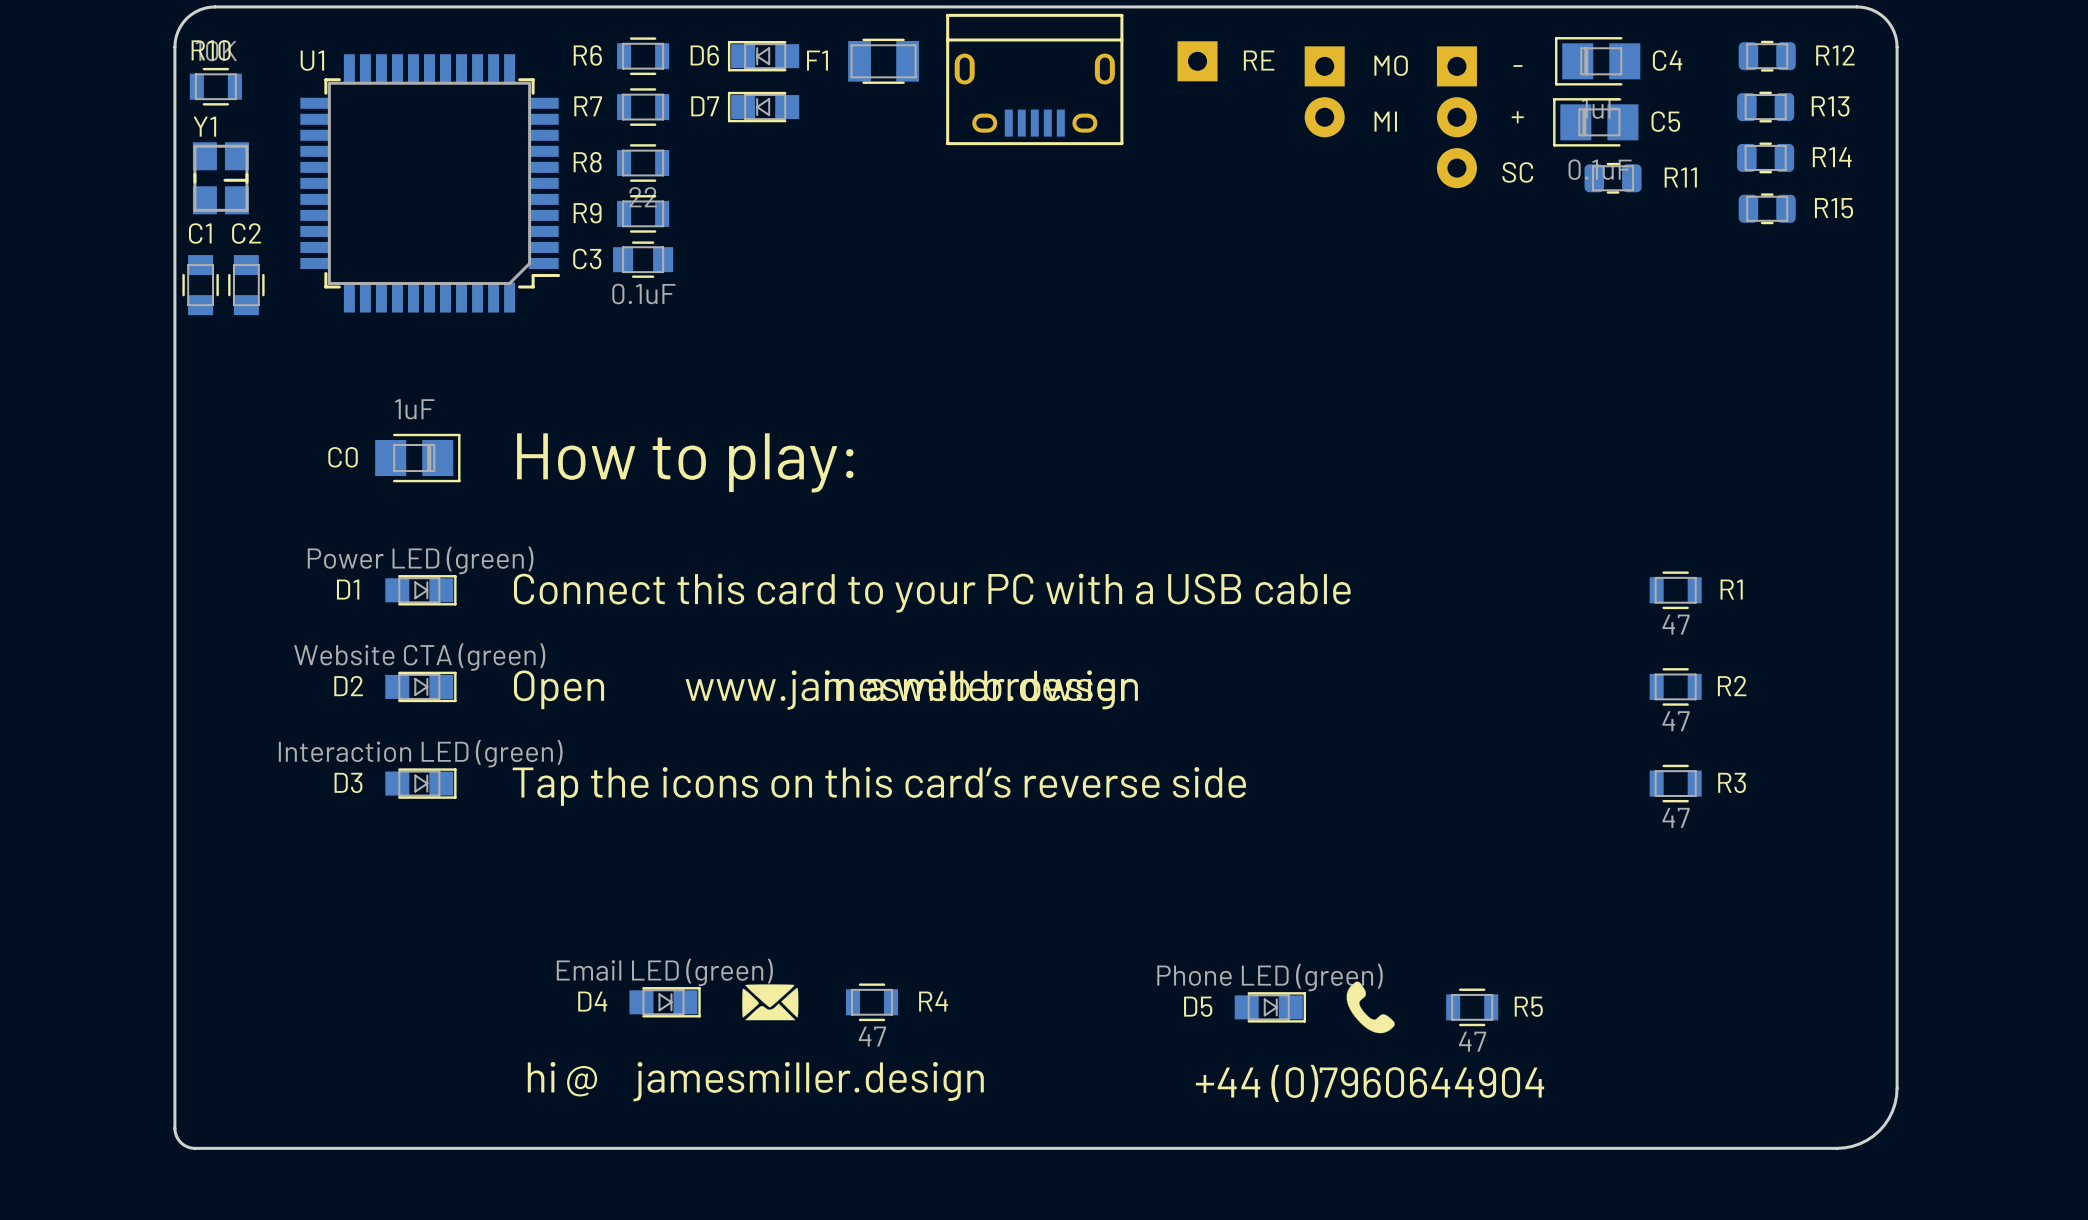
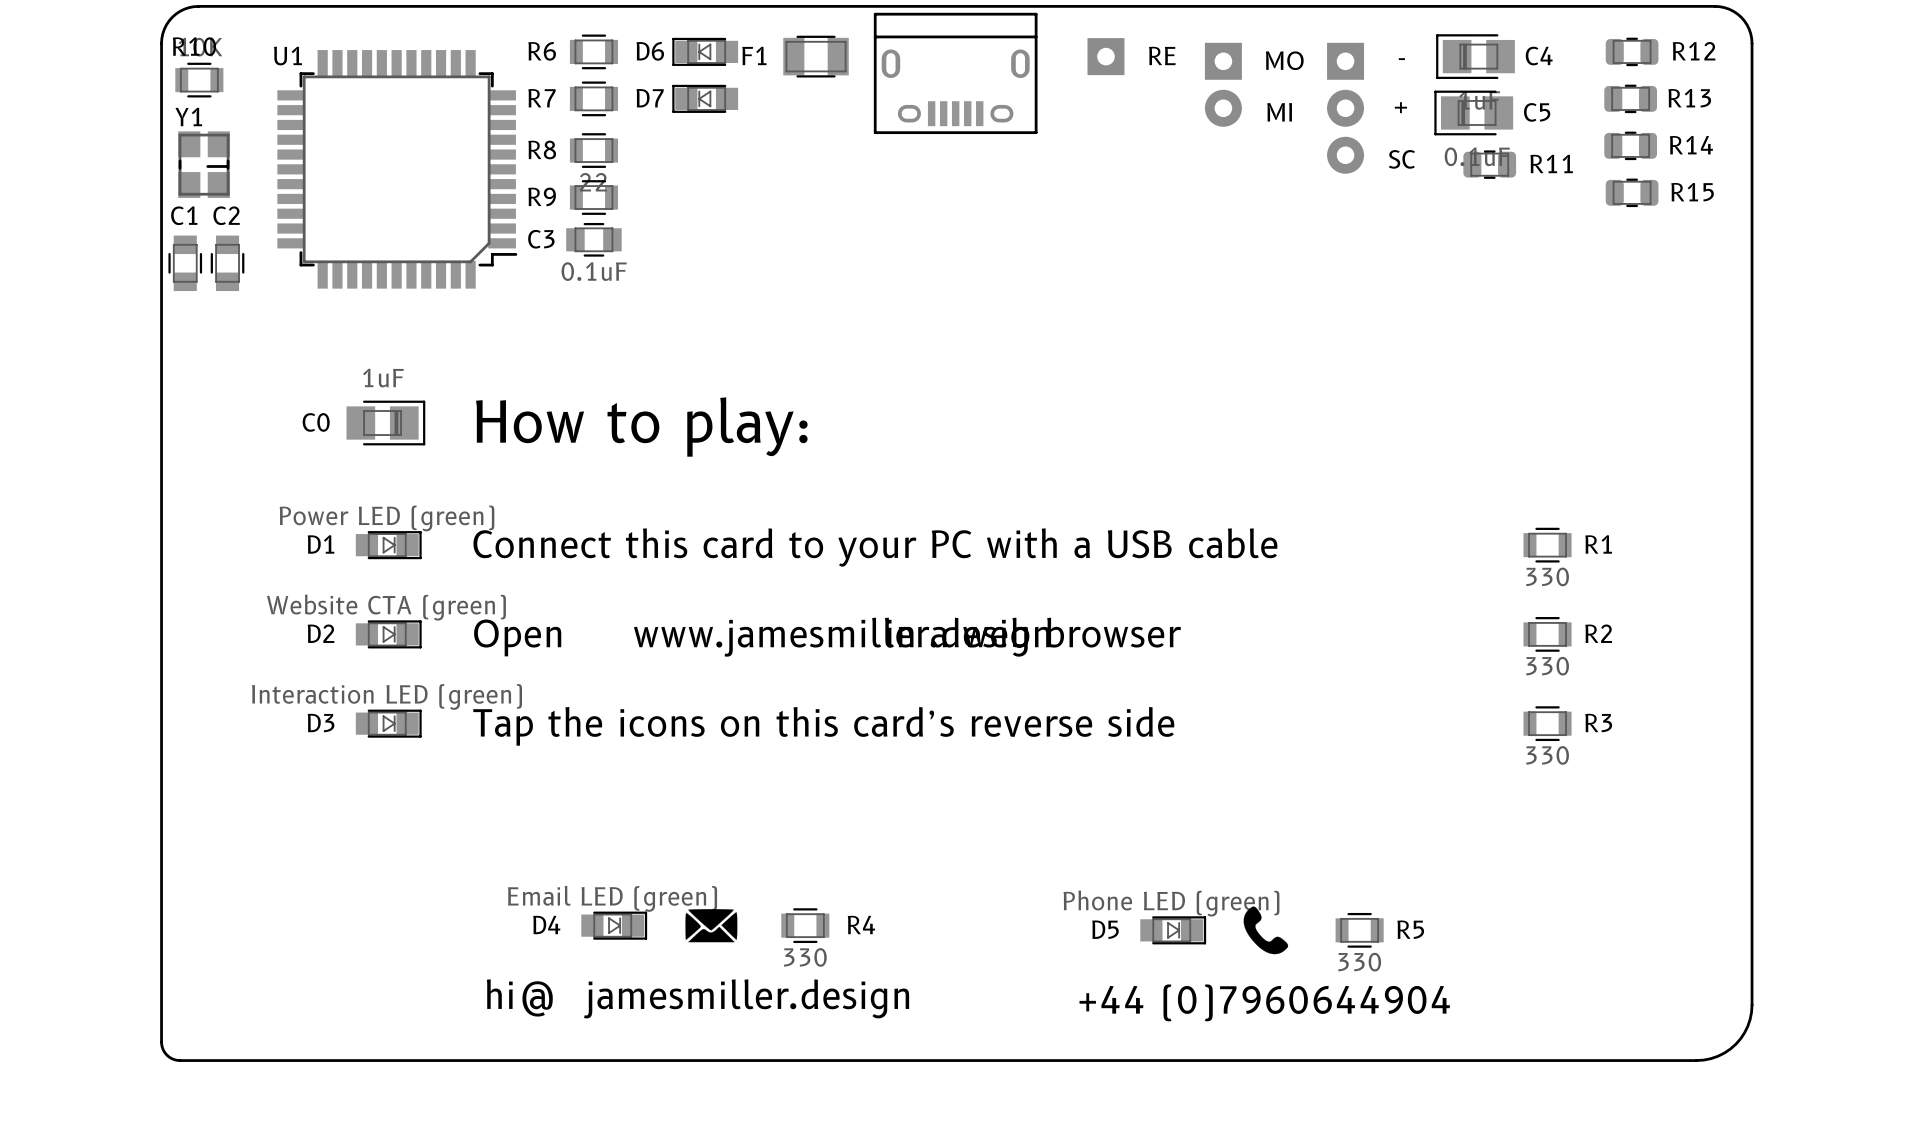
R1 value: 47 (1676, 624) -> 330 (1547, 576)
R2 value: 47 (1676, 721) -> 330 (1547, 666)
R3 value: 47 (1676, 817) -> 330 (1547, 755)
R4 value: 47 (872, 1036) -> 330 (805, 957)
R5 value: 47 (1472, 1041) -> 330 (1359, 962)

